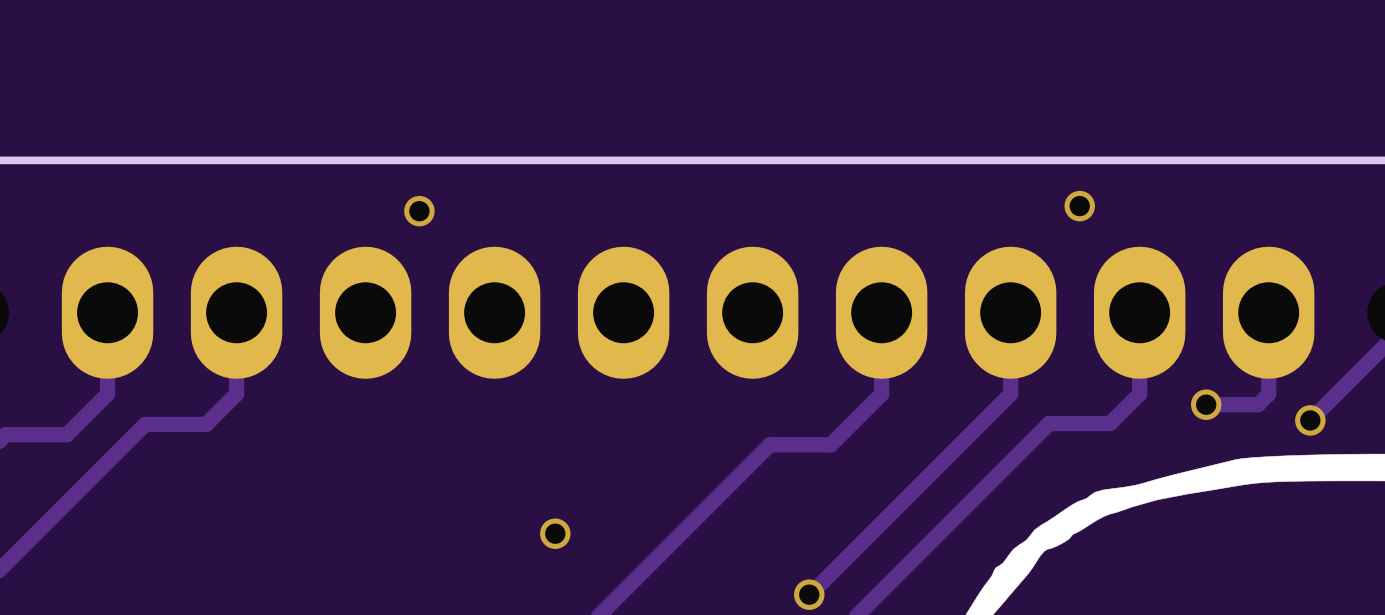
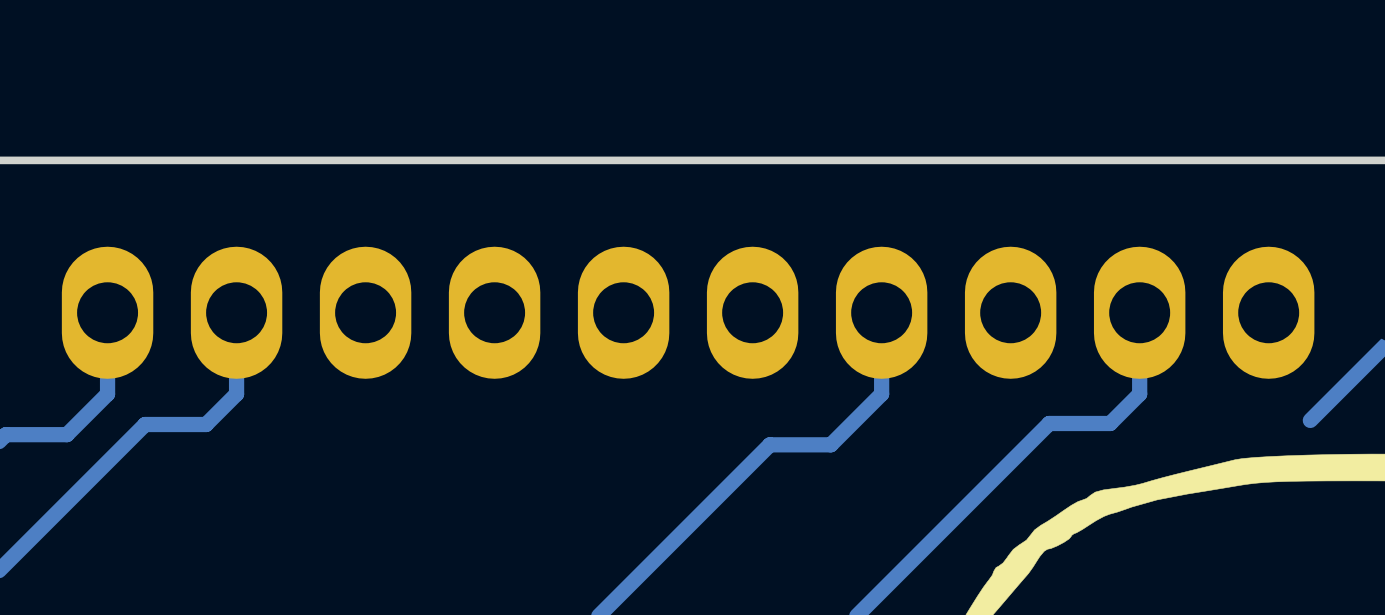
via: (1079, 206) -> none
via: (419, 211) -> none
track: (1010, 312) (1010, 394) (810, 594) -> none
track: (1268, 312) (1268, 394) (1258, 404) (1206, 404) -> none
via: (1206, 404) -> none
via: (1310, 420) -> none
via: (555, 533) -> none
via: (809, 594) -> none

